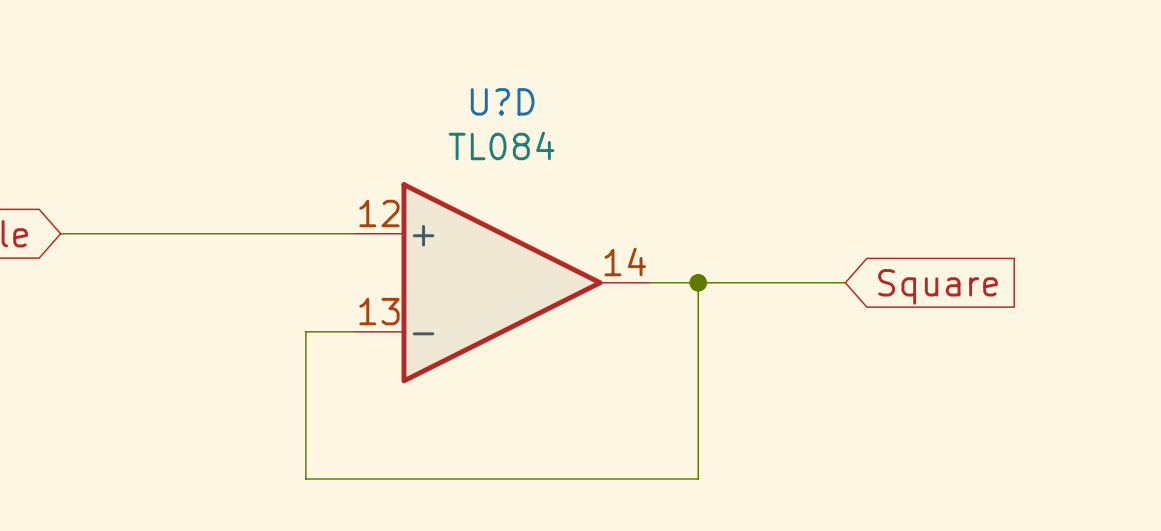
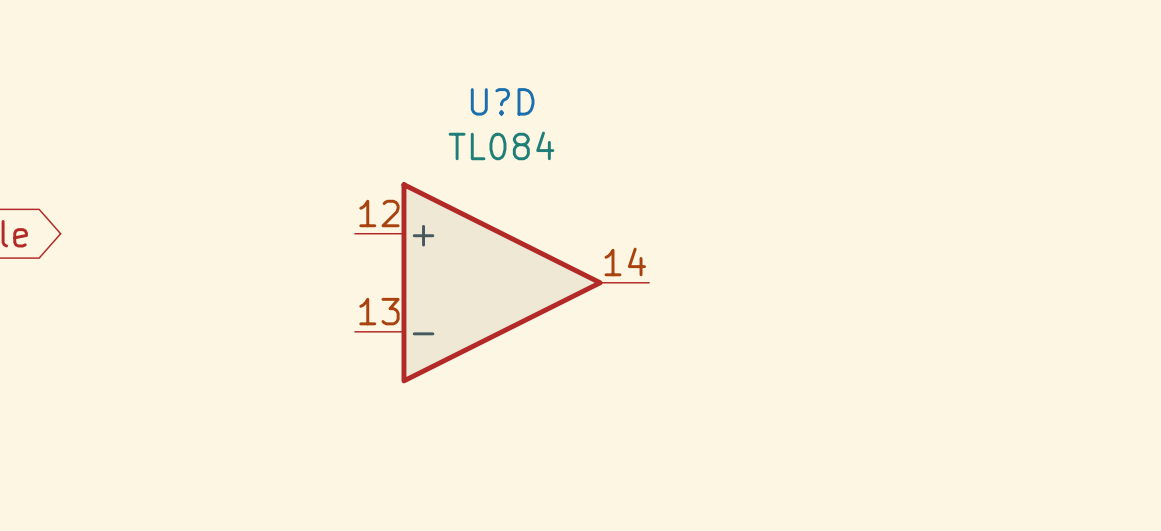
wire: (60, 233) (354, 233) -> none
wire: (649, 282) (845, 282) -> none
wire: (698, 282) (698, 478) (305, 478) (305, 331) (354, 331) -> none
junction: (698, 282) -> none
global label: Square (937, 286) -> none

